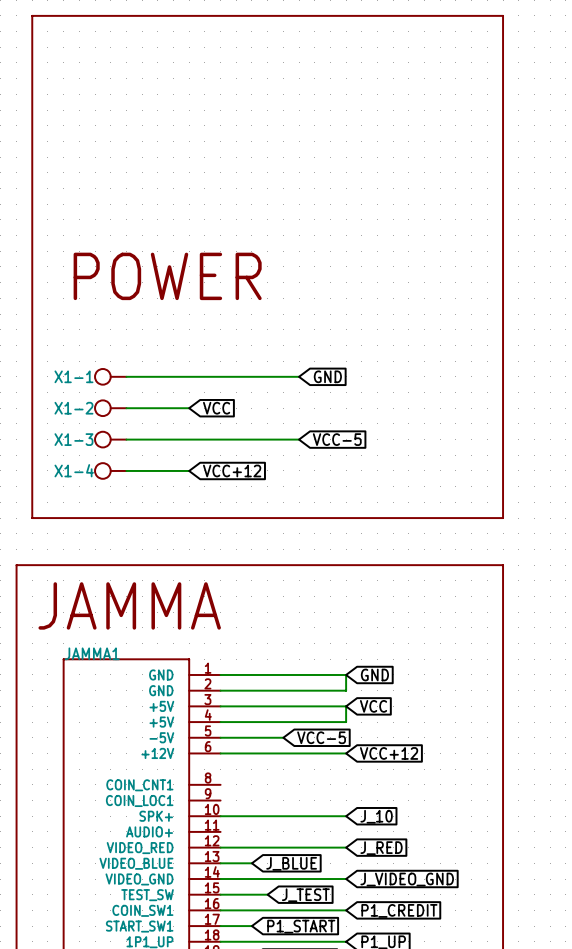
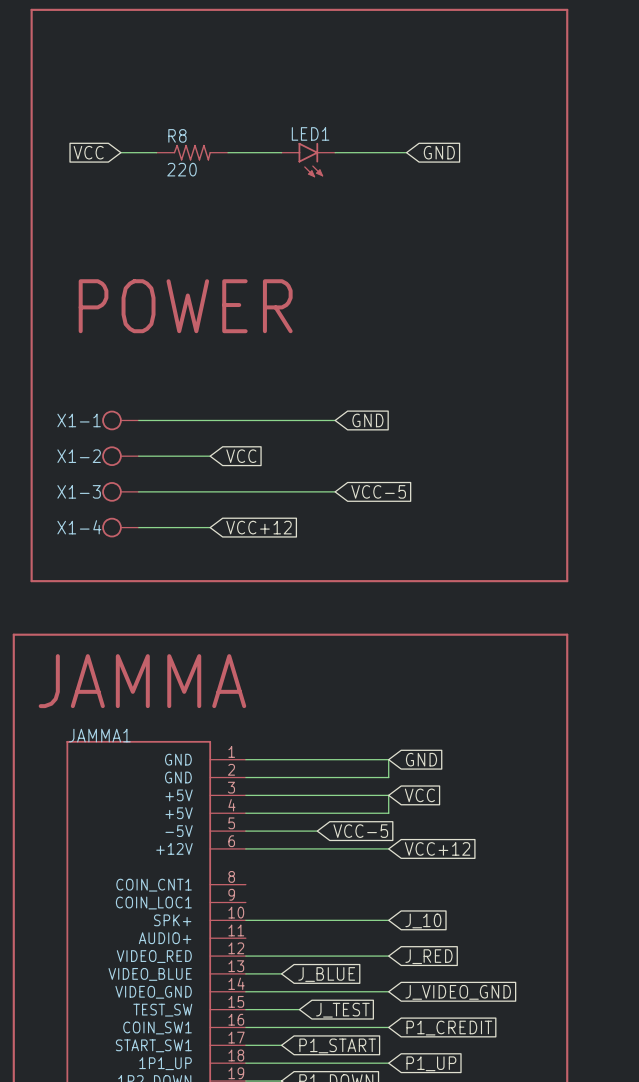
global label: none -> VCC (88, 152)
wire: none -> (120, 152) (156, 152)
R8: none -> 220 (192, 152)
wire: none -> (228, 152) (281, 152)
wire: none -> (335, 152) (406, 152)
global label: none -> GND (439, 152)
LED1: none -> (308, 160)

